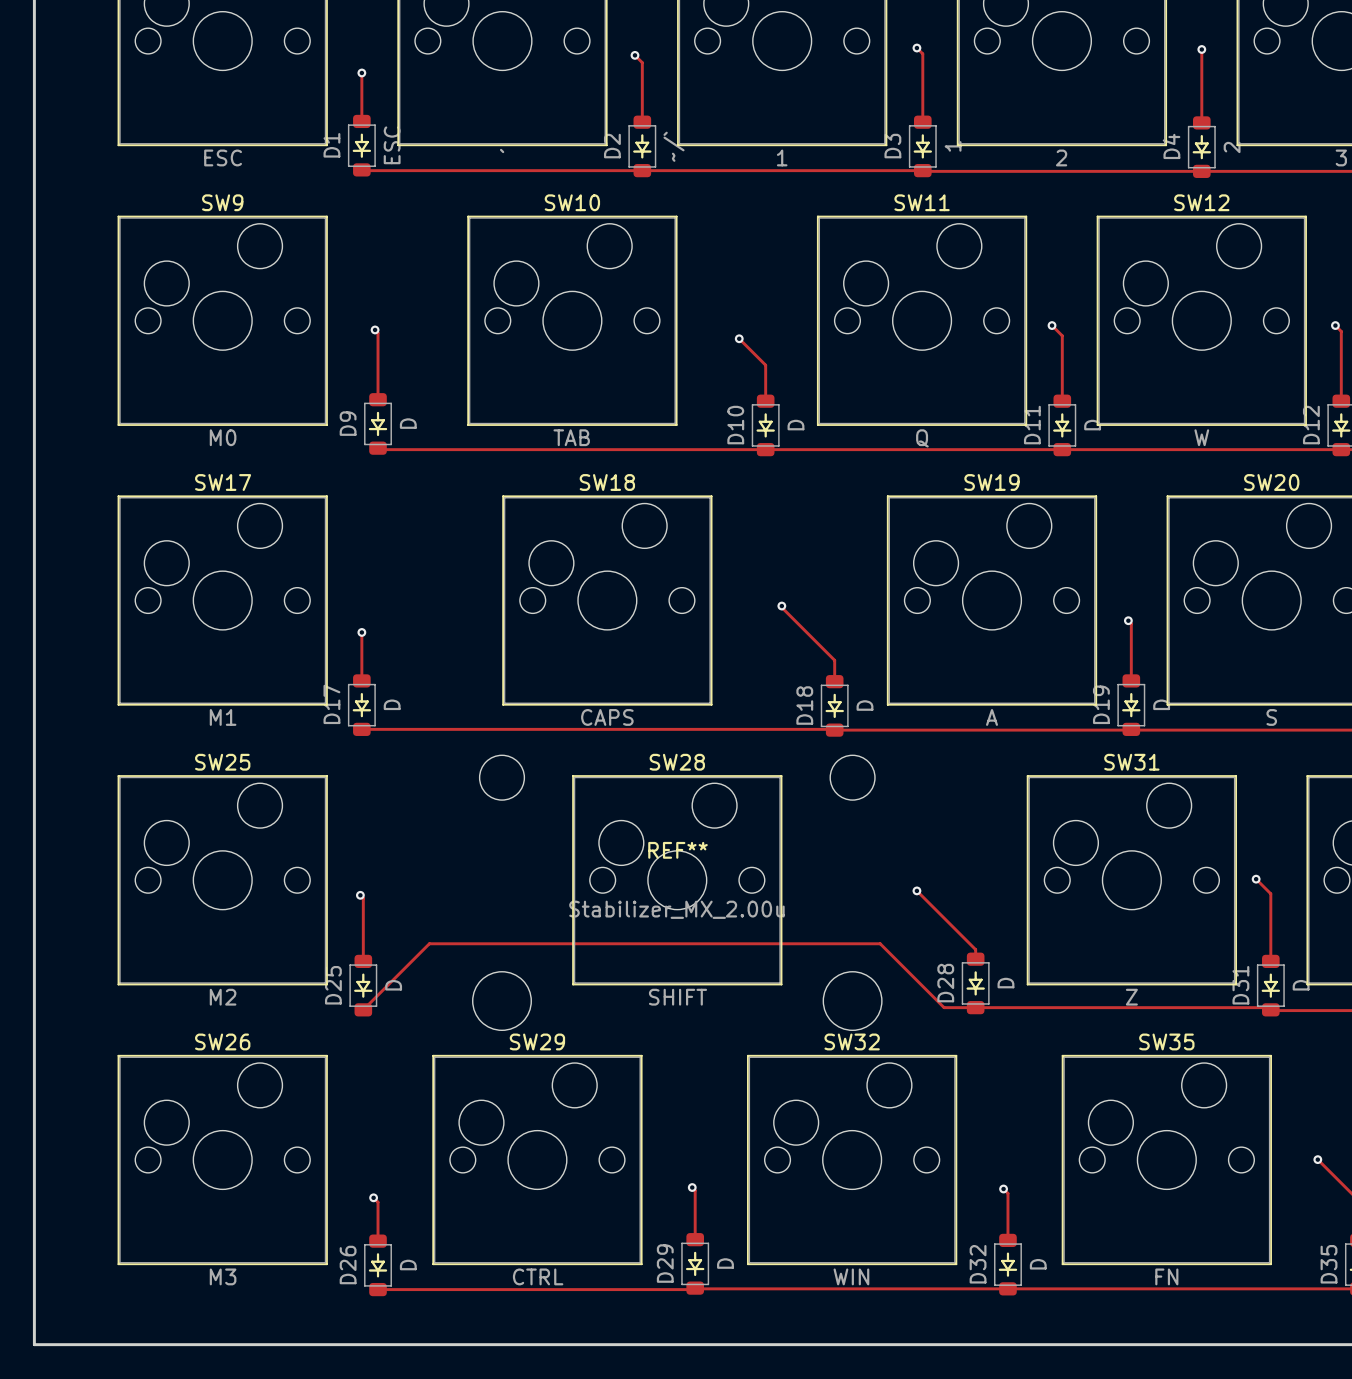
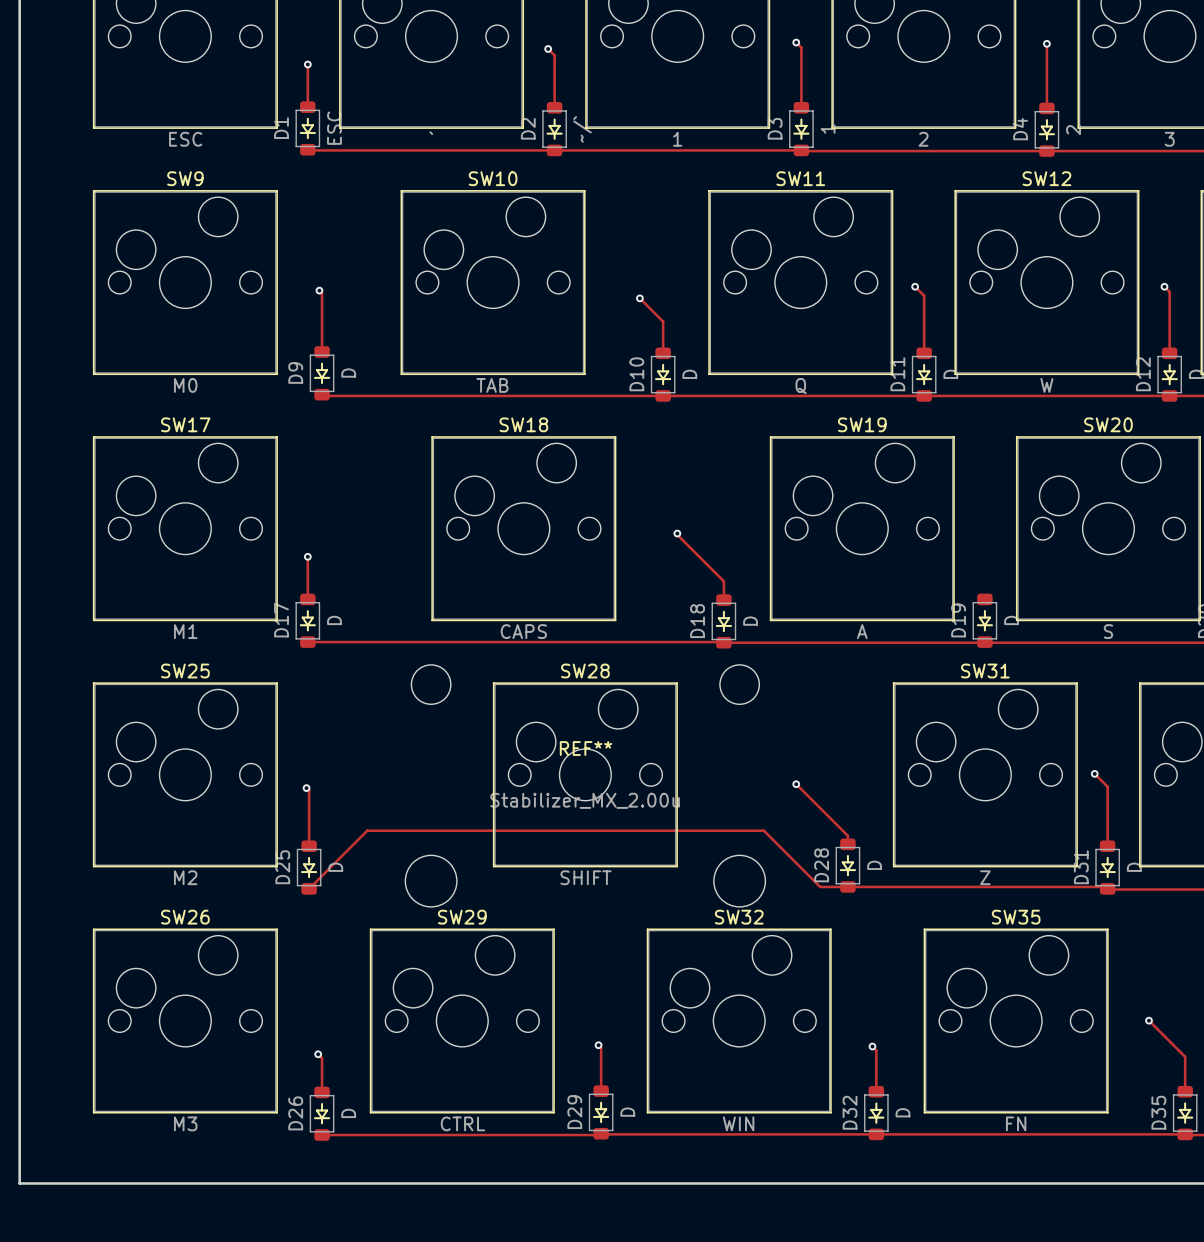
track: (1128, 620) (1131, 623) (1131, 680) -> none
via: (1128, 620) -> none

